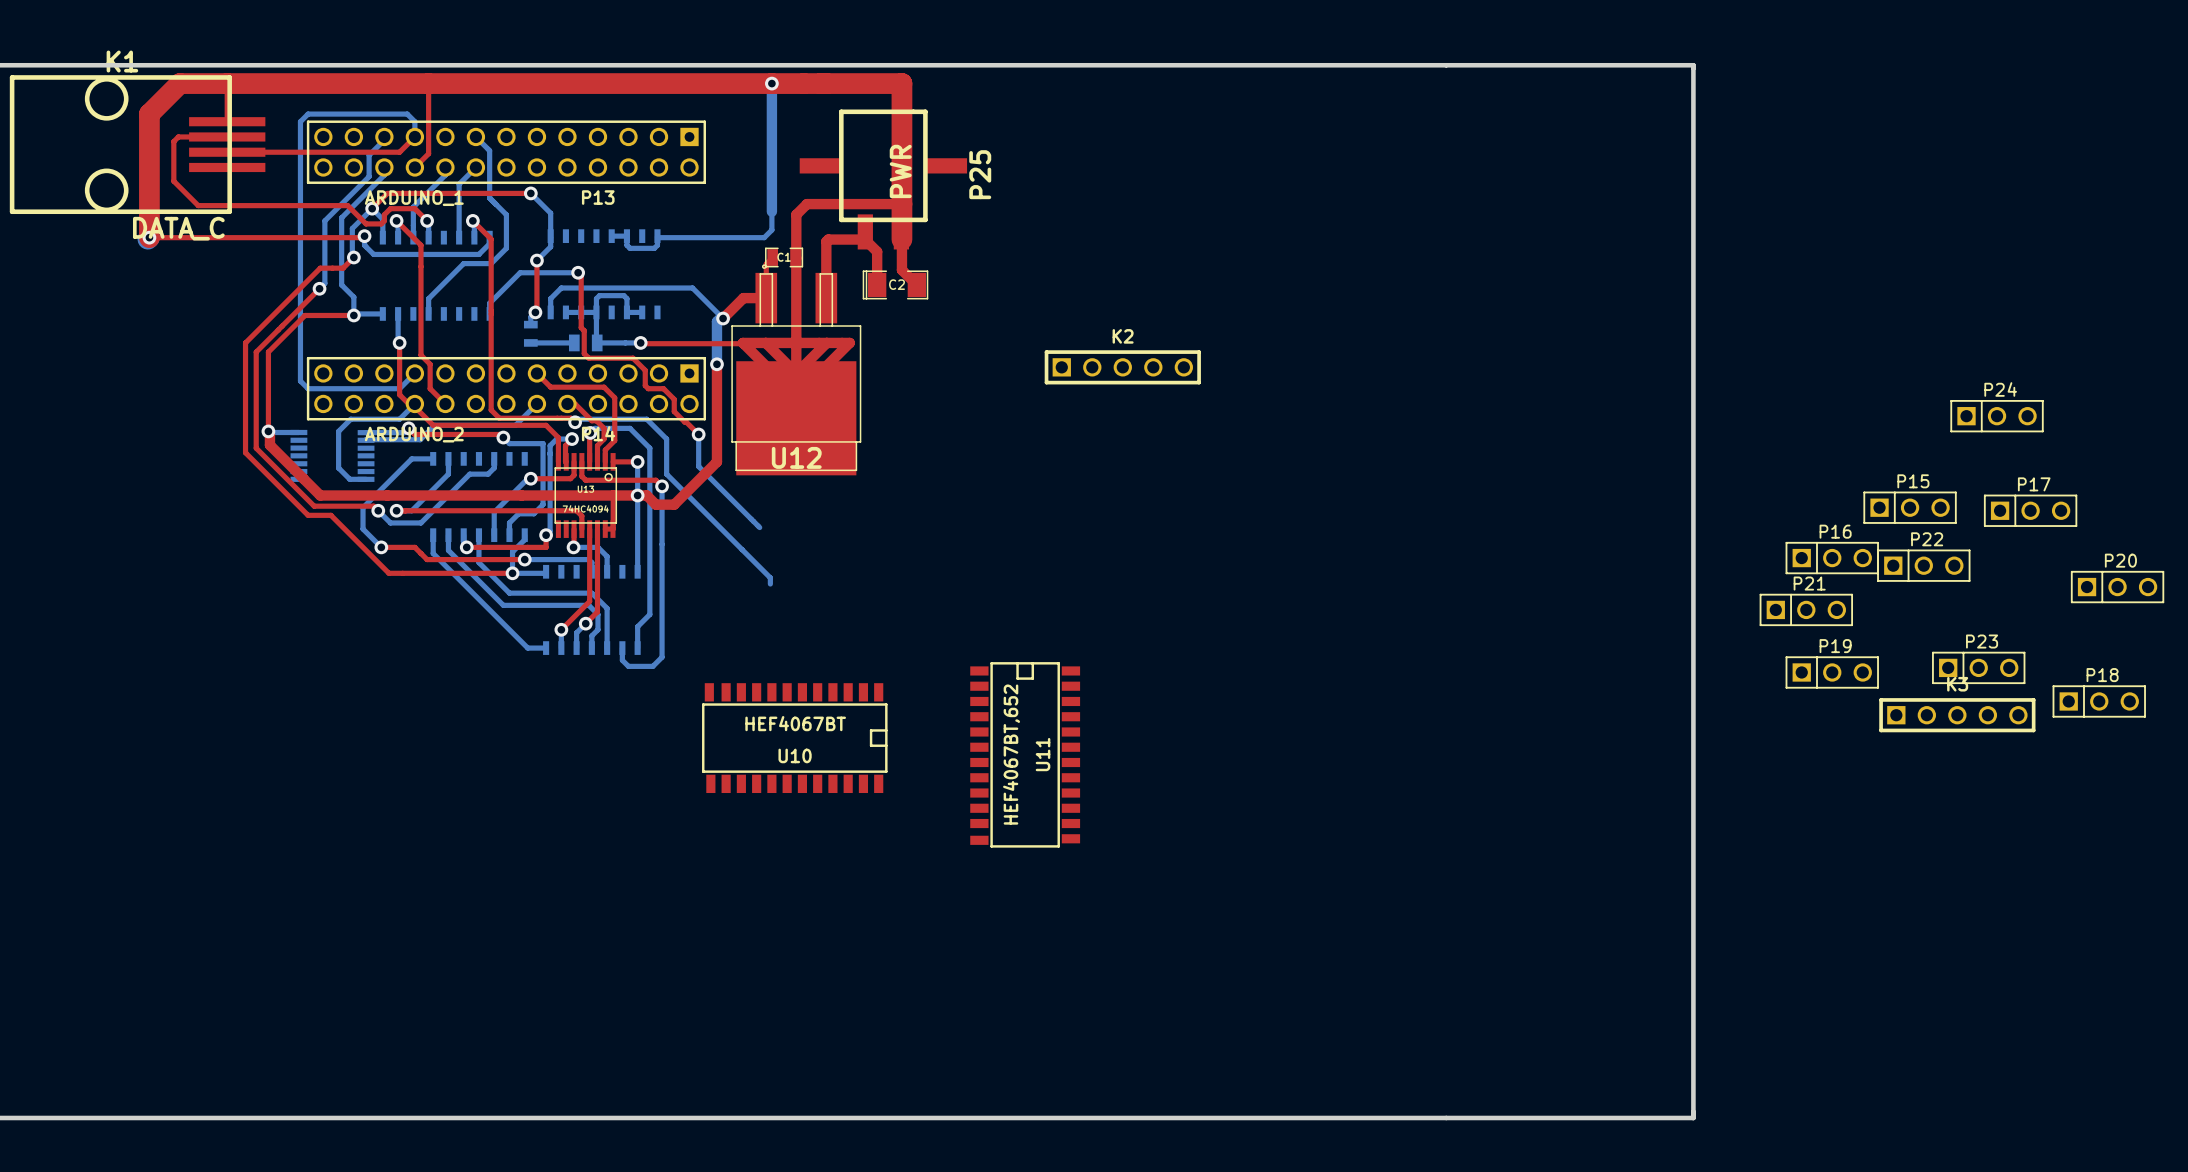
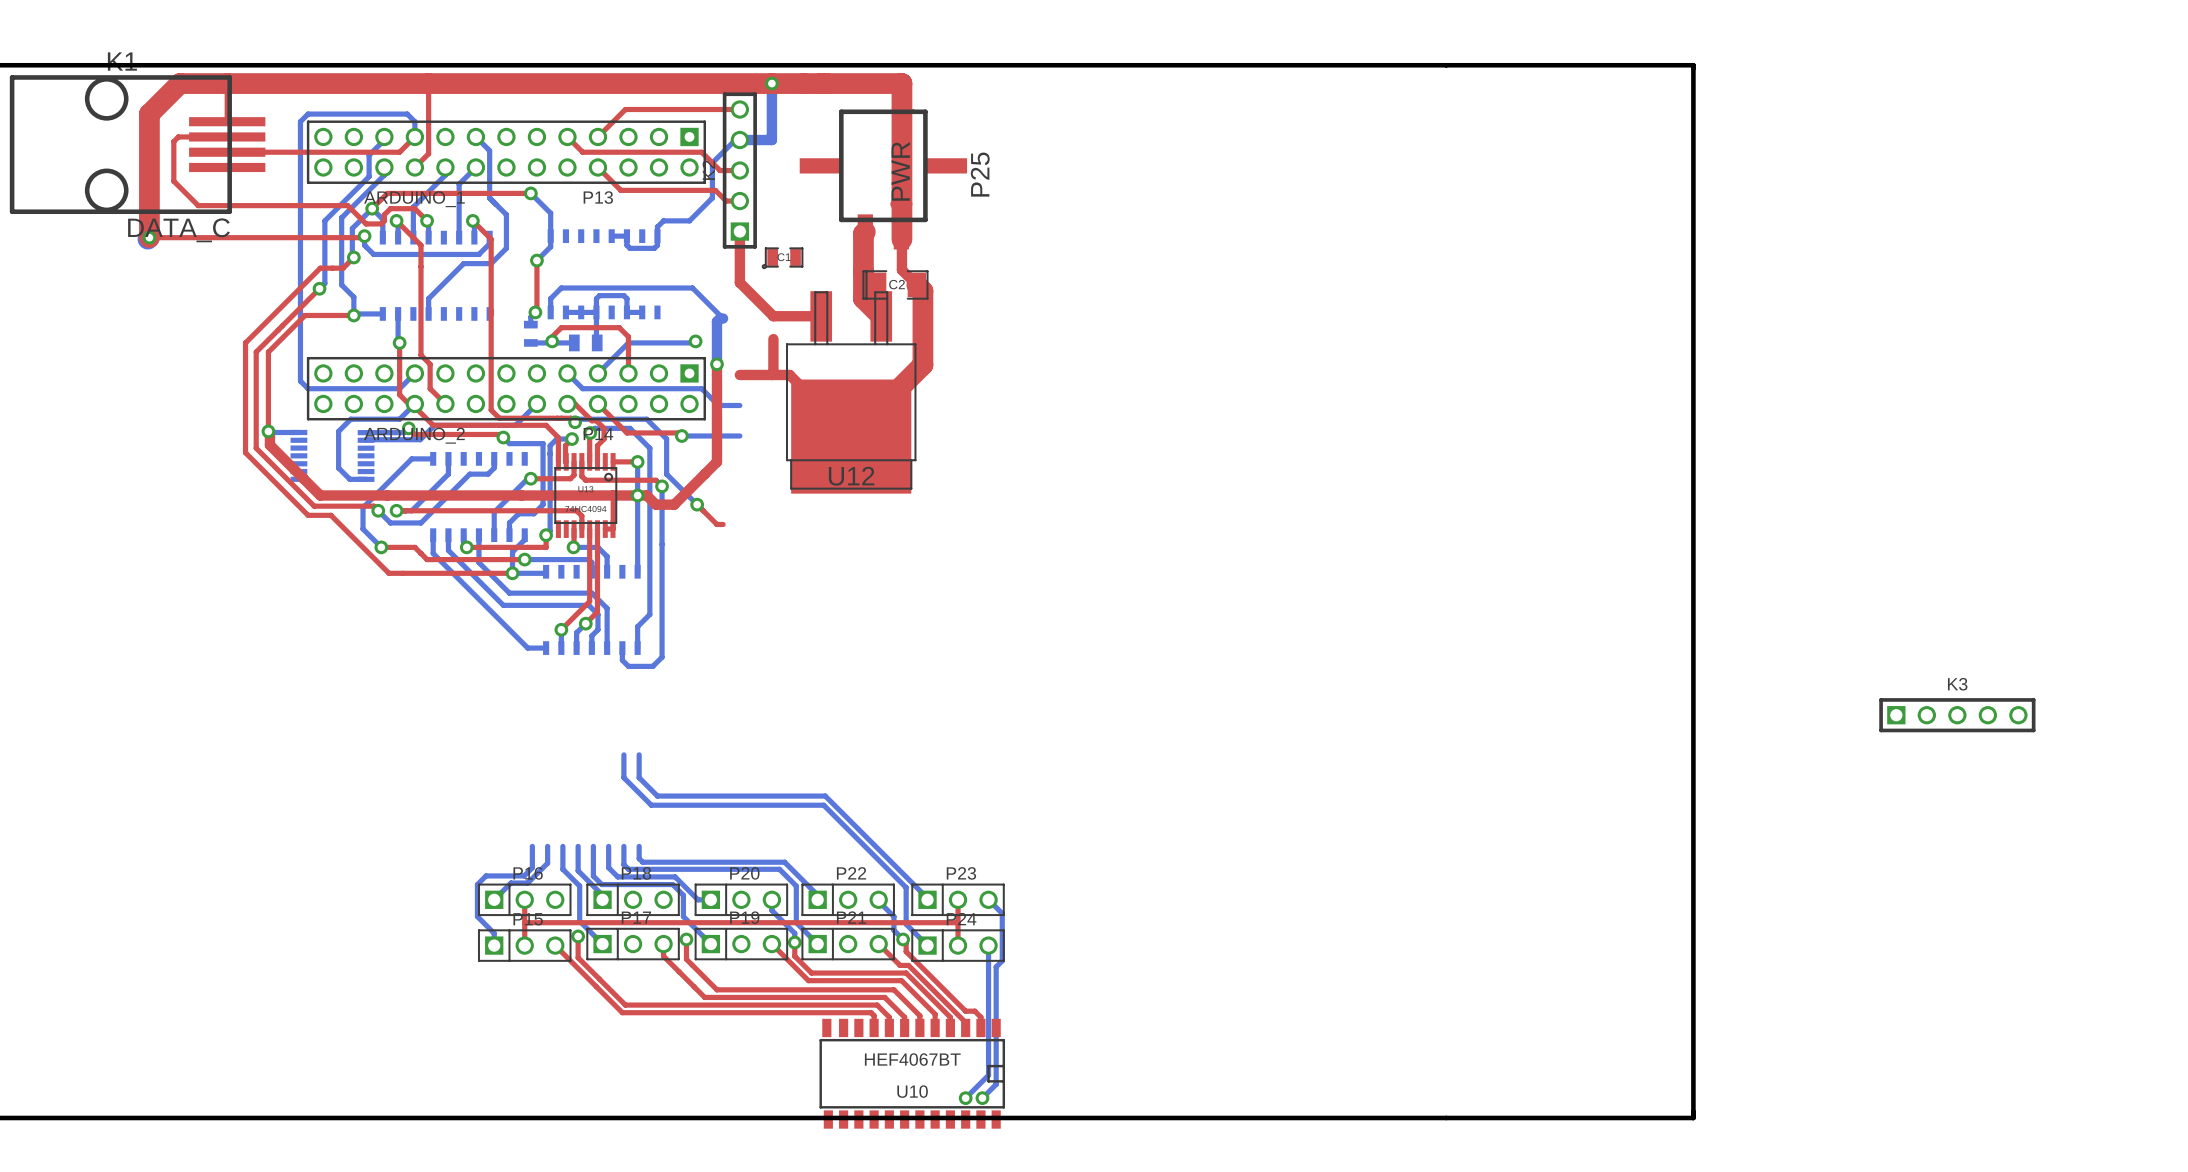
top track: none -> (739, 109) (625, 109) (597, 136)
top track: none -> (567, 136) (582, 152) (701, 152) (720, 170) (739, 170)
bottom track: (771, 138) (771, 230) (764, 237) (657, 237) -> (771, 138) (770, 138) (771, 140) (735, 140) (712, 162) (712, 197) (689, 220) (663, 220) (657, 226) (657, 236)
top track: none -> (597, 167) (620, 190) (715, 190) (726, 201) (739, 201)
top track: (895, 204) (806, 204) (796, 214) (796, 418) -> none
top track: none -> (739, 231) (739, 282) (773, 316) (821, 316)
top track: none -> (865, 231) (863, 233) (863, 298) (881, 316)
top track: (772, 257) (766, 263) (766, 298) (743, 298) (723, 318) -> none
top track: (578, 272) (581, 275) (581, 327) (584, 330) (584, 353) (588, 358) (633, 358) (645, 370) (645, 385) (648, 388) (663, 388) (674, 399) (674, 411) (698, 434) -> none
bottom track: (578, 272) (520, 272) (489, 303) (489, 313) -> none
via: (578, 272) -> none
top track: (877, 284) (877, 251) (864, 239) (828, 239) (826, 241) (826, 298) -> none
top track: none -> (916, 284) (922, 291) (922, 364) (851, 436) (789, 374) (739, 374)
via: (723, 318) -> none
top track: none -> (773, 339) (771, 374)
top track: none -> (552, 341) (552, 336) (561, 327) (619, 327) (628, 336) (628, 373)
via: none -> (552, 341)
bottom track: none -> (695, 341) (640, 342)
via: none -> (695, 341)
bottom track: (597, 342) (628, 342) -> (597, 373) (628, 342)
top track: (640, 342) (743, 343) -> none
via: (640, 342) -> none
top track: (742, 342) (796, 396) (849, 342) (742, 342) -> none
top track: (765, 342) (796, 373) (826, 342) -> none
K2 rotation: 0° (1122, 367) -> 90° counterclockwise (739, 170)
K2 position: (1122, 367) -> (739, 170)
top track: (536, 373) (550, 387) (604, 387) (614, 397) (614, 440) (605, 450) (605, 461) -> none
bottom track: none -> (567, 373) (582, 388) (701, 388) (718, 405) (739, 405)
U12 position: (796, 374) -> (851, 392)
top track: none -> (597, 403) (626, 432) (678, 432) (681, 436)
P24 position: (1997, 416) -> (958, 945)
bottom track: (698, 434) (698, 466) (759, 527) -> none
via position: (698, 434) -> (681, 436)
bottom track: none -> (681, 436) (739, 436)
top track: none -> (697, 504) (716, 524) (723, 524)
bottom track: (697, 504) (770, 577) (770, 583) -> none
via: none -> (697, 504)
P15 position: (1910, 507) -> (524, 945)
P17 position: (2030, 510) -> (633, 944)
P16 position: (1832, 558) -> (524, 899)
P22 position: (1923, 565) -> (848, 899)
P20 position: (2117, 587) -> (741, 899)
P21 position: (1806, 609) -> (848, 944)
P23 position: (1978, 667) -> (958, 899)
P19 position: (1832, 672) -> (741, 944)
P18 position: (2099, 701) -> (633, 899)
U10 position: (794, 738) -> (912, 1073)
bottom track: none -> (623, 754) (623, 777) (651, 805) (823, 805) (906, 887) (906, 924) (927, 945)
bottom track: none -> (639, 754) (639, 777) (657, 796) (825, 796) (927, 899)
U11: HEF4067BT,652 (1025, 754) -> none
bottom track: none -> (532, 846) (532, 867) (524, 875) (486, 875) (477, 884) (477, 916) (494, 933) (494, 945)
bottom track: none -> (547, 846) (547, 863) (527, 883) (511, 883) (494, 899)
bottom track: none -> (562, 846) (562, 869) (579, 886) (579, 921) (602, 944)
bottom track: none -> (578, 846) (578, 870) (602, 895) (602, 899)
bottom track: none -> (593, 846) (593, 876) (601, 884) (672, 884) (683, 895) (683, 916) (710, 944)
bottom track: none -> (608, 846) (608, 867) (617, 876) (675, 876) (697, 899) (710, 899)
bottom track: none -> (623, 846) (623, 864) (628, 869) (779, 869) (796, 886) (796, 922) (817, 944)
bottom track: none -> (639, 846) (639, 858) (642, 862) (784, 862) (817, 895) (817, 899)
top track: none -> (524, 899) (524, 945)
bottom track: none -> (771, 899) (771, 910) (794, 933) (794, 942)
bottom track: none -> (878, 899) (893, 916) (893, 930) (903, 939)
top track: none -> (958, 899) (958, 945)
bottom track: none -> (988, 899) (1002, 913) (1002, 960) (996, 966) (996, 1084) (982, 1098)
top track: none -> (524, 922) (958, 922)
top track: none -> (578, 936) (578, 957) (625, 1005) (877, 1005) (889, 1017) (889, 1027)
via: none -> (578, 936)
top track: none -> (686, 939) (686, 959) (716, 989) (893, 989) (919, 1015) (919, 1027)
via: none -> (686, 939)
top track: none -> (903, 939) (906, 942) (906, 951) (965, 1011) (974, 1011) (980, 1017) (980, 1027)
via: none -> (903, 939)
top track: none -> (794, 942) (794, 956) (811, 973) (906, 973) (950, 1017) (950, 1027)
via: none -> (794, 942)
top track: none -> (663, 944) (663, 956) (704, 997) (884, 997) (904, 1017) (904, 1027)
top track: none -> (771, 944) (808, 980) (901, 980) (935, 1014) (935, 1027)
top track: none -> (878, 944) (900, 965) (908, 965) (965, 1022) (965, 1027)
top track: none -> (555, 945) (622, 1012) (871, 1012) (874, 1015) (874, 1027)
bottom track: none -> (988, 945) (988, 1075) (965, 1098)
via: none -> (965, 1098)
via: none -> (982, 1098)

